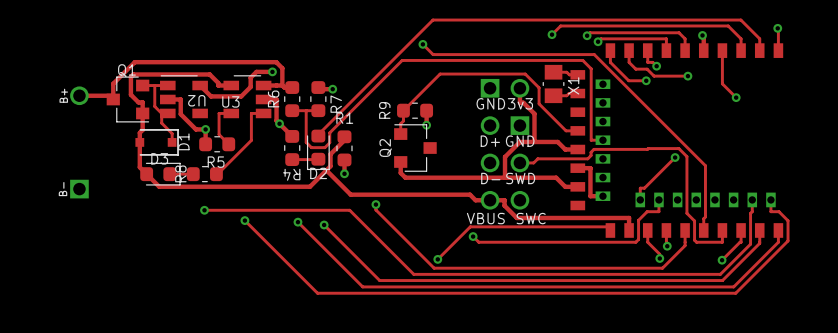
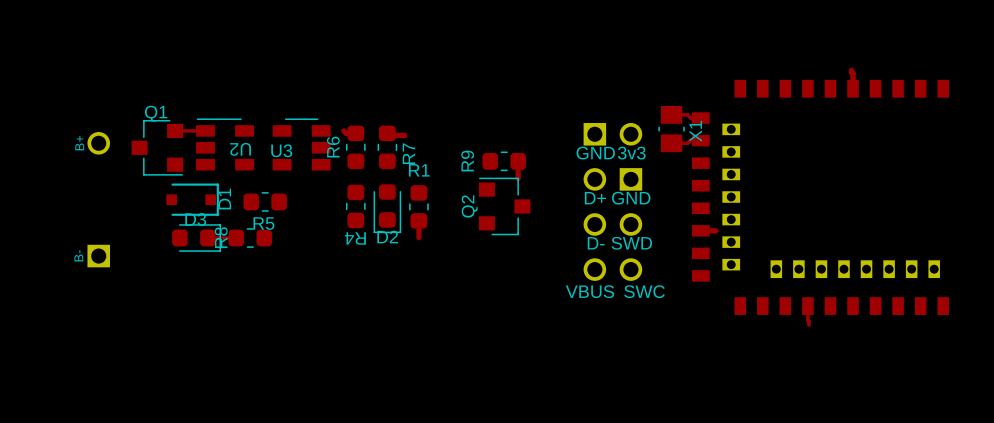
track: (777, 28) (778, 50) -> none
via: (777, 28) -> none
track: (552, 34) (560, 25) (728, 25) (741, 38) (741, 50) -> none
via: (552, 34) -> none
track: (587, 35) (590, 32) (679, 32) (685, 38) (685, 50) -> none
via: (587, 35) -> none
via: (702, 35) -> none
track: (598, 41) (600, 38) (666, 38) (666, 50) -> none
via: (598, 41) -> none
track: (422, 44) (433, 54) (594, 54) (705, 165) (703, 230) -> none
via: (422, 44) -> none
track: (610, 50) (610, 62) (628, 80) (646, 80) -> none
track: (629, 50) (629, 62) (635, 69) (647, 69) (654, 76) (687, 76) -> none
track: (647, 50) (647, 62) (652, 62) (656, 66) -> none
track: (722, 50) (722, 83) (736, 97) -> none
track: (759, 50) (759, 38) (740, 20) (432, 20) (318, 136) -> none
via: (656, 66) -> none
track: (272, 71) (256, 71) (250, 77) (250, 87) (241, 96) (211, 96) (200, 85) -> none
via: (272, 71) -> none
via: (687, 76) -> none
via: (646, 80) -> none
track: (154, 85) (154, 106) (161, 113) -> none
track: (231, 85) (218, 85) (218, 83) (209, 74) (133, 74) (130, 76) (130, 94) (138, 102) (142, 102) (142, 129) (139, 132) (139, 167) (159, 186) (310, 186) (330, 166) (330, 154) (344, 140) (344, 136) -> none
track: (263, 85) (282, 85) (282, 68) (276, 62) (134, 62) (113, 83) (113, 99) -> none
track: (519, 88) (519, 102) (523, 102) (534, 113) (534, 141) -> none
via: (332, 89) -> none
track: (79, 95) (113, 95) -> none
via: (736, 97) -> none
track: (167, 99) (180, 99) (180, 114) (195, 129) (205, 129) (205, 144) -> none
track: (263, 99) (276, 99) (276, 120) (292, 136) -> none
track: (292, 110) (318, 110) -> none
track: (306, 110) (306, 142) (311, 147) (324, 147) (329, 142) (329, 132) (402, 60) (582, 60) (591, 68) (591, 140) (602, 140) -> none
track: (161, 113) (161, 123) (172, 133) (172, 142) -> none
track: (231, 113) (219, 113) (219, 134) (228, 144) -> none
track: (263, 113) (251, 113) (251, 140) (216, 174) -> none
via: (279, 123) -> none
via: (426, 125) -> none
via: (205, 129) -> none
track: (577, 130) (566, 130) (539, 103) (539, 87) (525, 74) (440, 74) (403, 110) (400, 134) -> none
track: (577, 149) (565, 149) (557, 141) (520, 141) (505, 156) (505, 177) -> none
track: (675, 157) (644, 188) (640, 188) (640, 199) -> none
via: (675, 157) -> none
track: (318, 159) (292, 159) -> none
track: (400, 161) (400, 173) (405, 177) (556, 177) (565, 186) (577, 186) -> none
track: (519, 162) (533, 162) (537, 158) (587, 158) (593, 149) (678, 148) (686, 156) (686, 213) (694, 220) (694, 240) (696, 242) (722, 242) (722, 230) -> none
track: (590, 168) (590, 196) (602, 196) -> none
track: (326, 170) (350, 194) (470, 194) (475, 200) (504, 200) (504, 205) (516, 217) (629, 217) (629, 230) -> none
via: (344, 173) -> none
track: (658, 199) (658, 211) (647, 211) (638, 220) (638, 239) (635, 242) (478, 242) (473, 236) -> none
track: (752, 199) (750, 244) (720, 274) (413, 274) (349, 210) (204, 210) -> none
track: (770, 199) (770, 211) (778, 211) (788, 220) (788, 240) (735, 293) (317, 293) (244, 220) -> none
track: (375, 204) (375, 209) (434, 268) (662, 268) (685, 245) (685, 230) -> none
via: (375, 204) -> none
via: (204, 210) -> none
via: (244, 220) -> none
track: (297, 222) (362, 286) (733, 286) (778, 242) (778, 230) -> none
via: (297, 222) -> none
track: (324, 224) (379, 280) (722, 280) (759, 243) (759, 230) -> none
via: (324, 224) -> none
track: (610, 230) (606, 226) (470, 226) (437, 259) -> none
track: (647, 230) (647, 242) (659, 254) (659, 258) -> none
track: (741, 230) (741, 242) (722, 260) -> none
via: (473, 236) -> none
via: (667, 246) -> none
via: (659, 258) -> none
via: (437, 259) -> none
via: (722, 260) -> none

